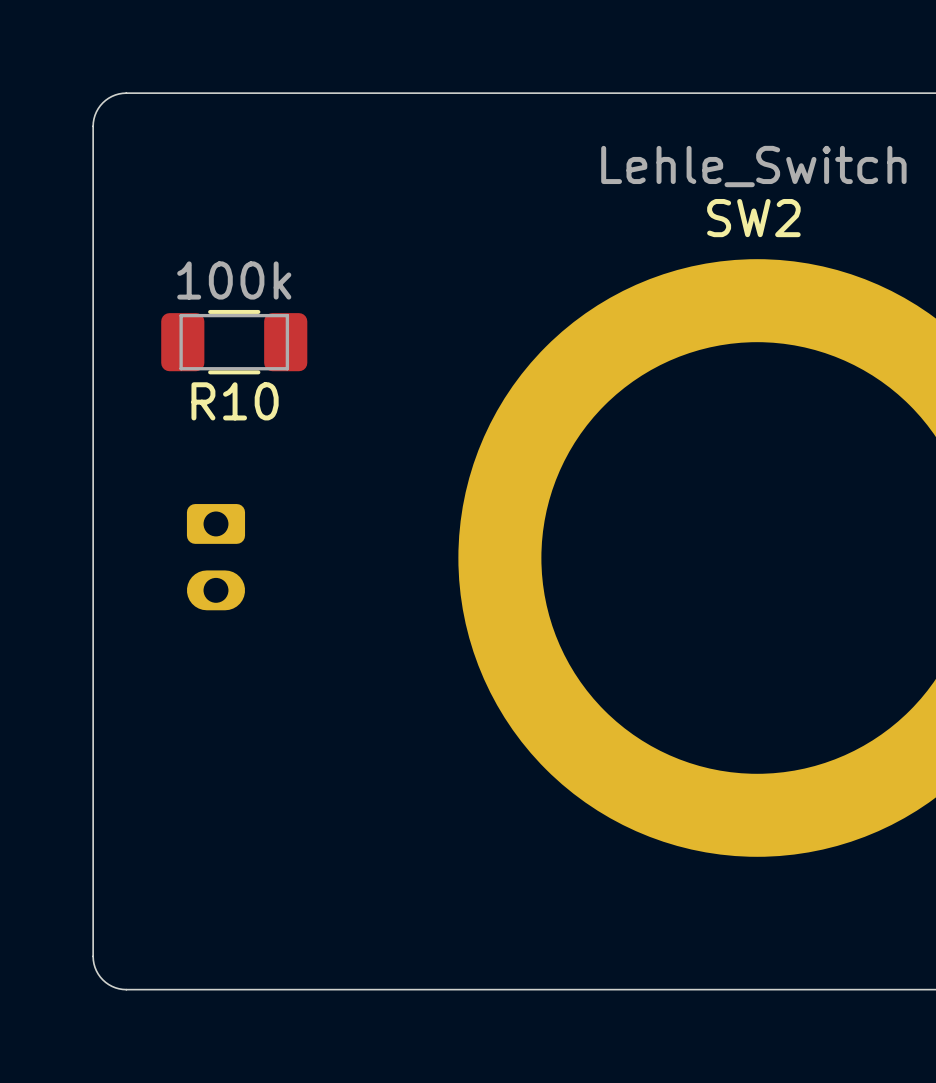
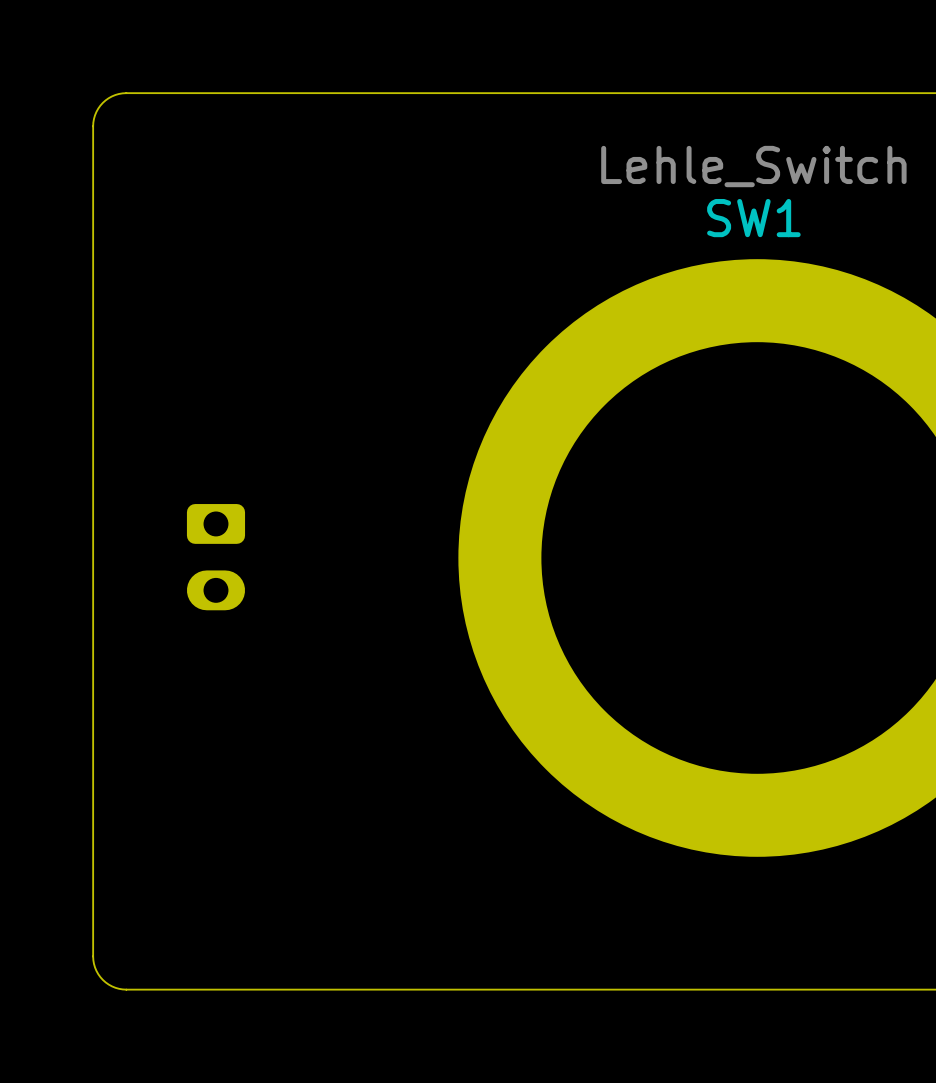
SW2 name: SW2 (753, 218) -> SW1 (753, 218)
R10: 100k (234, 342) -> none

